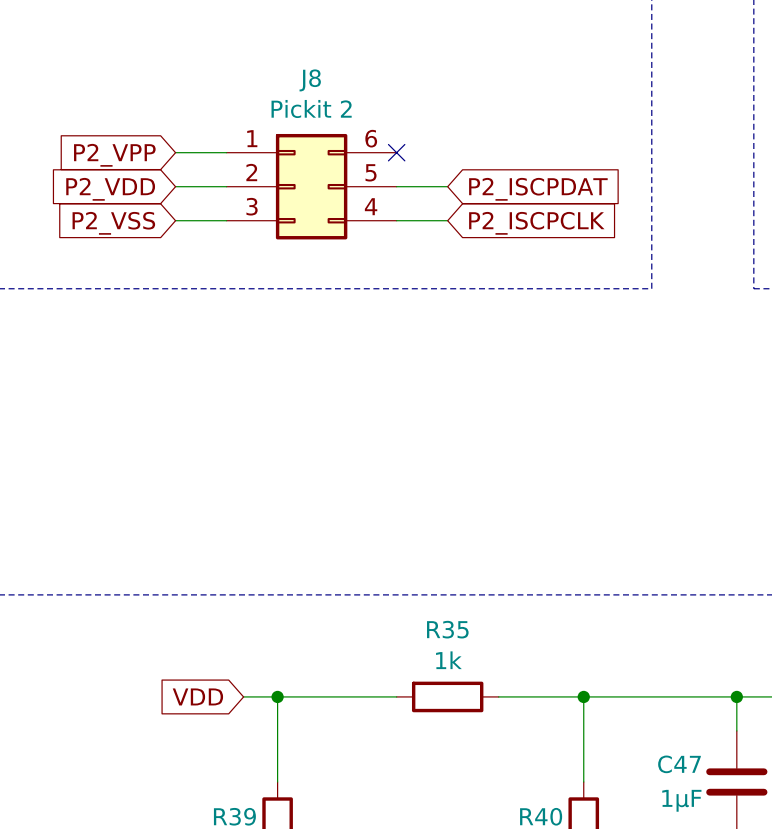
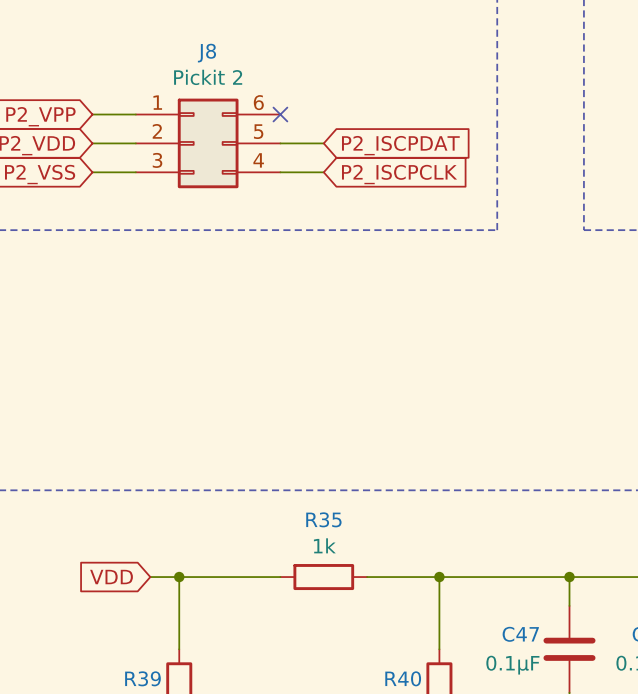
C47 value: 1μF (681, 800) -> 0.1μF (512, 665)

